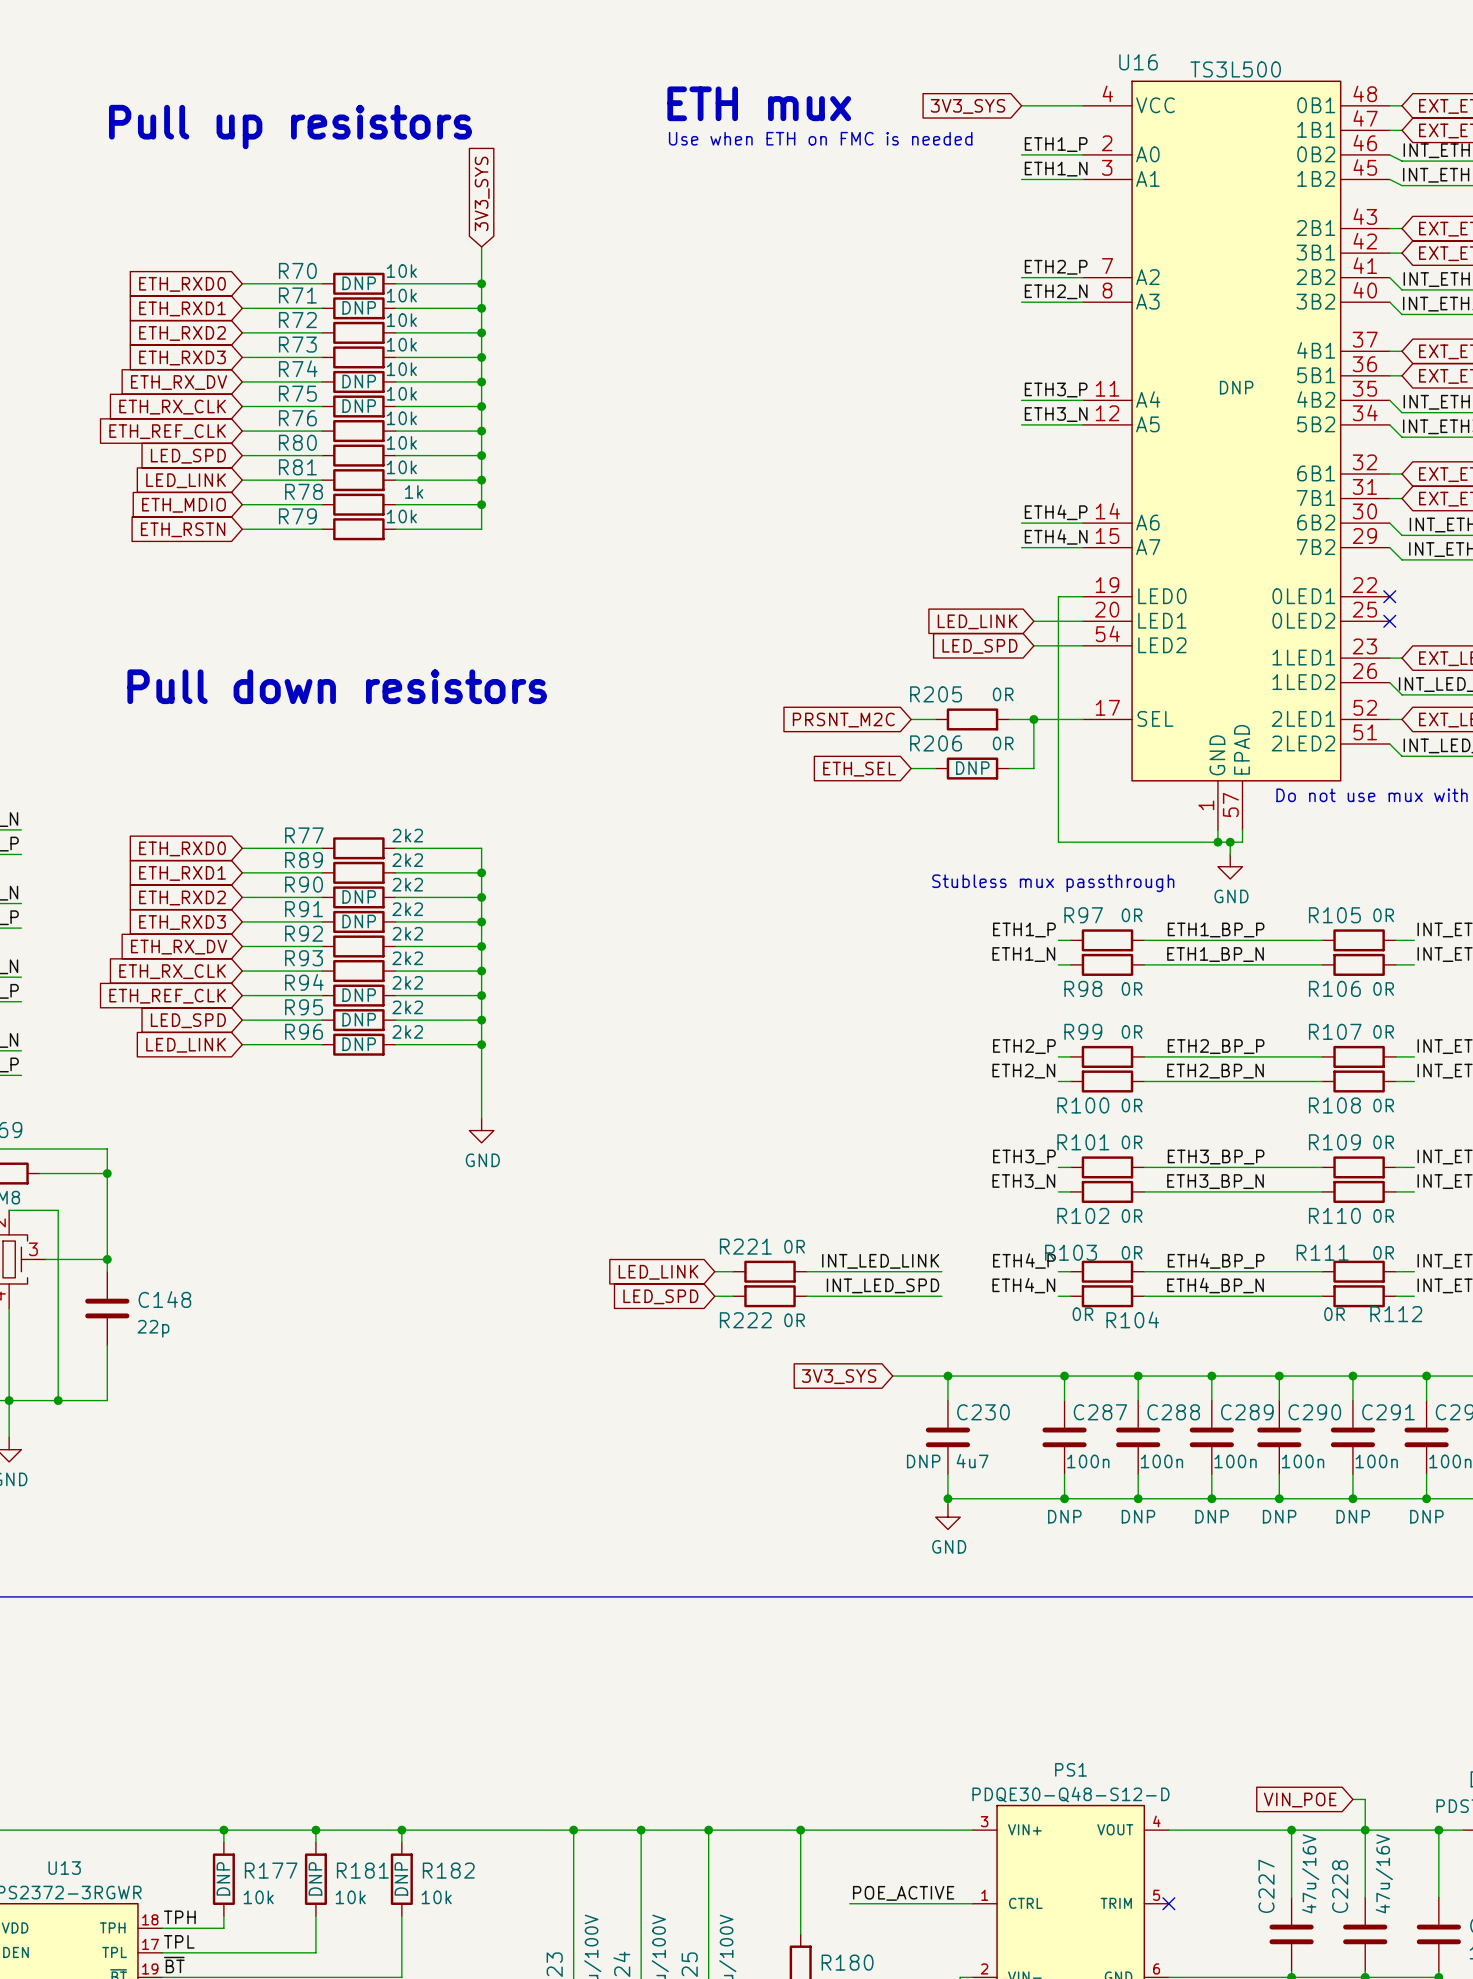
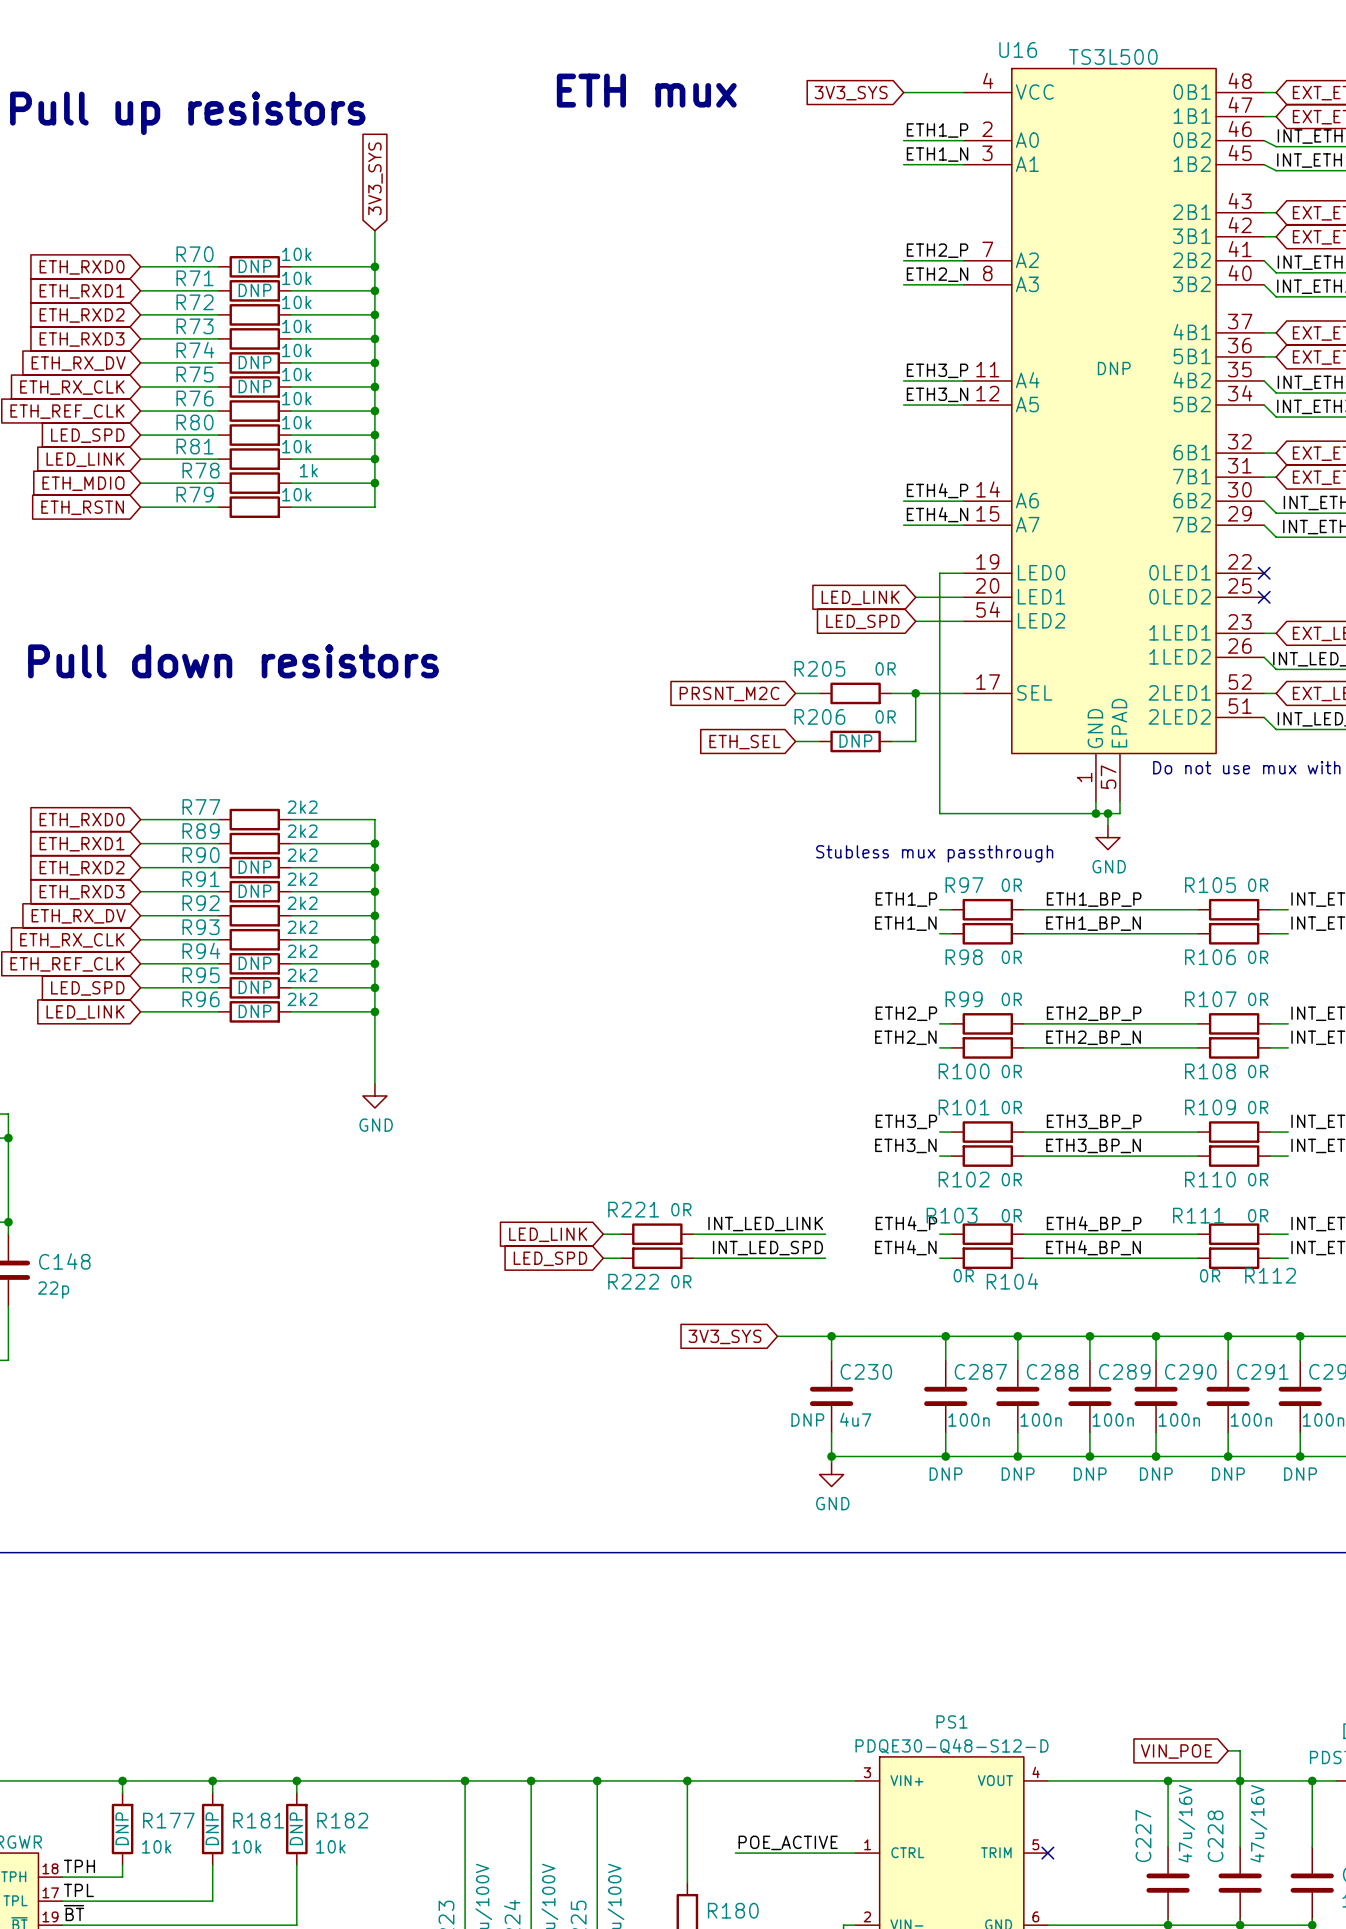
text: Use when ETH on FMC is needed (820, 138) -> none

